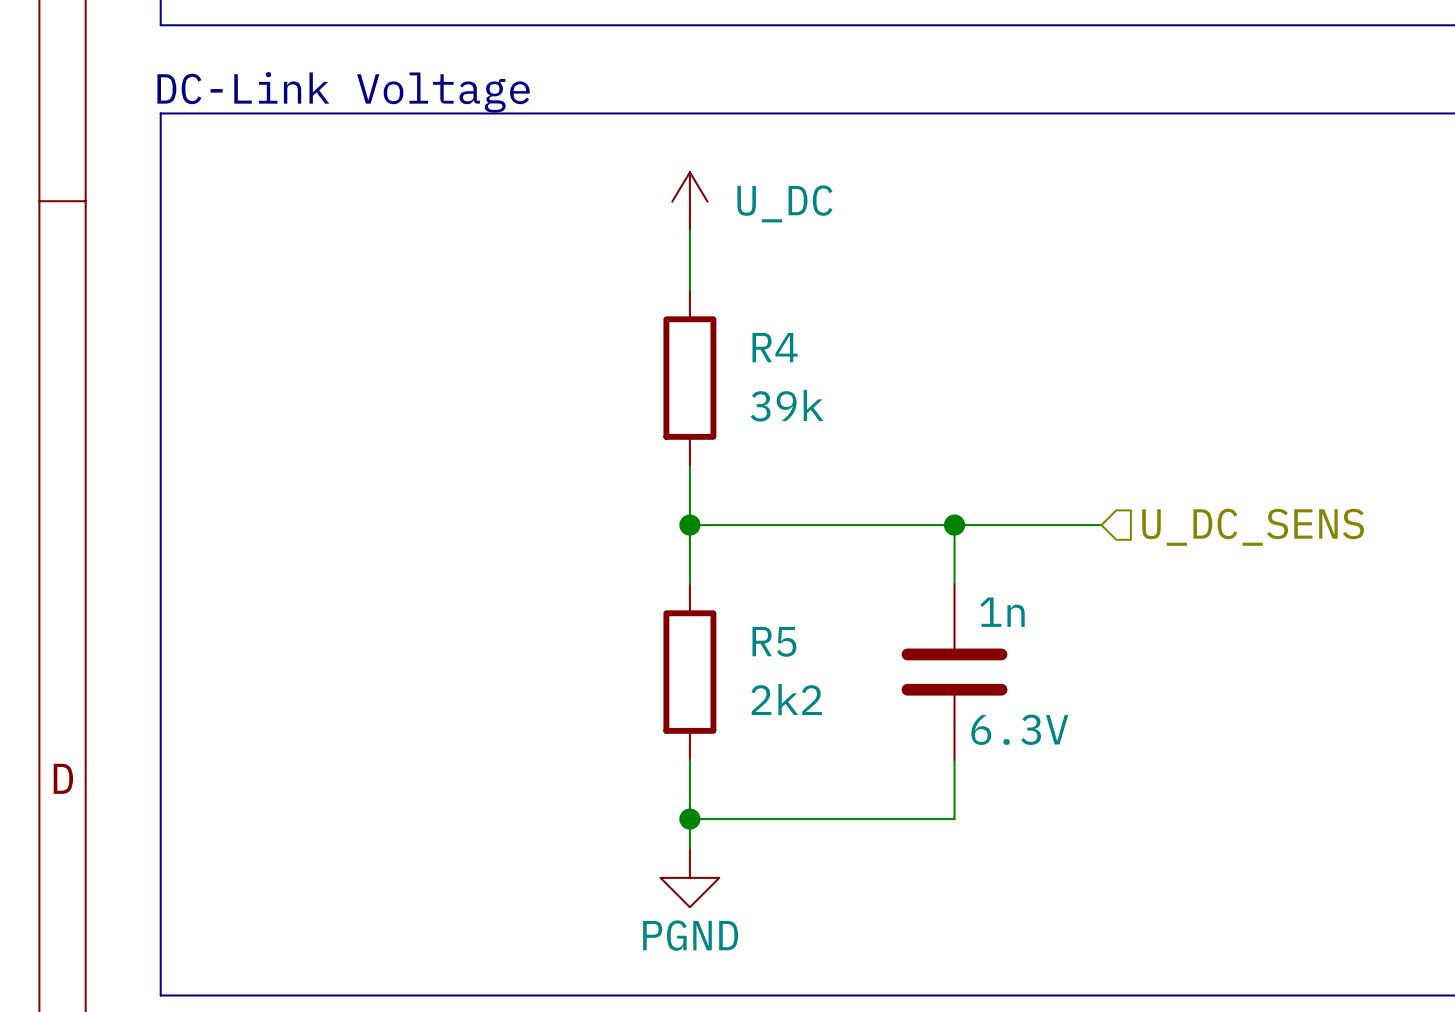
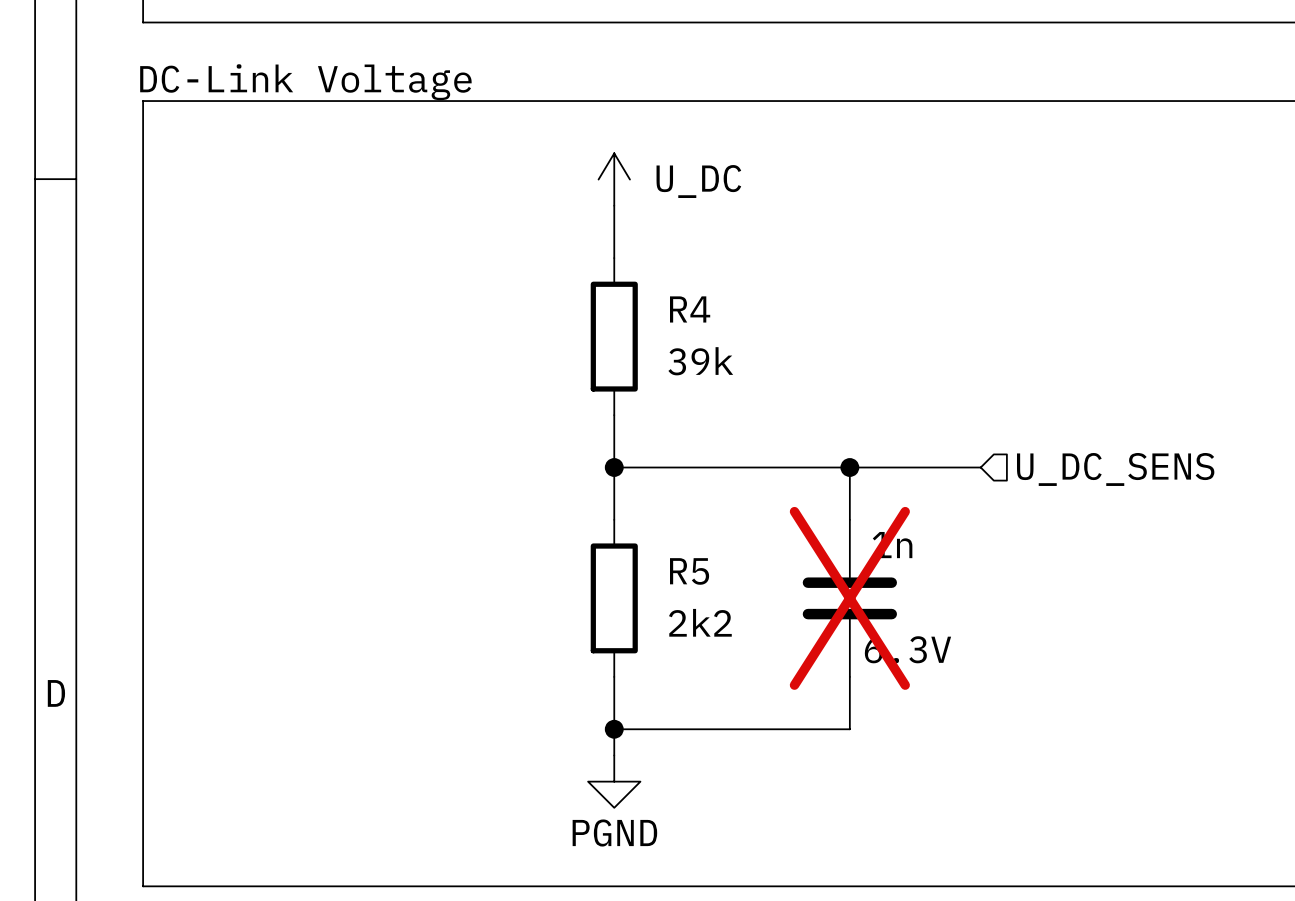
part do-not-place cross: none -> (849, 598)

